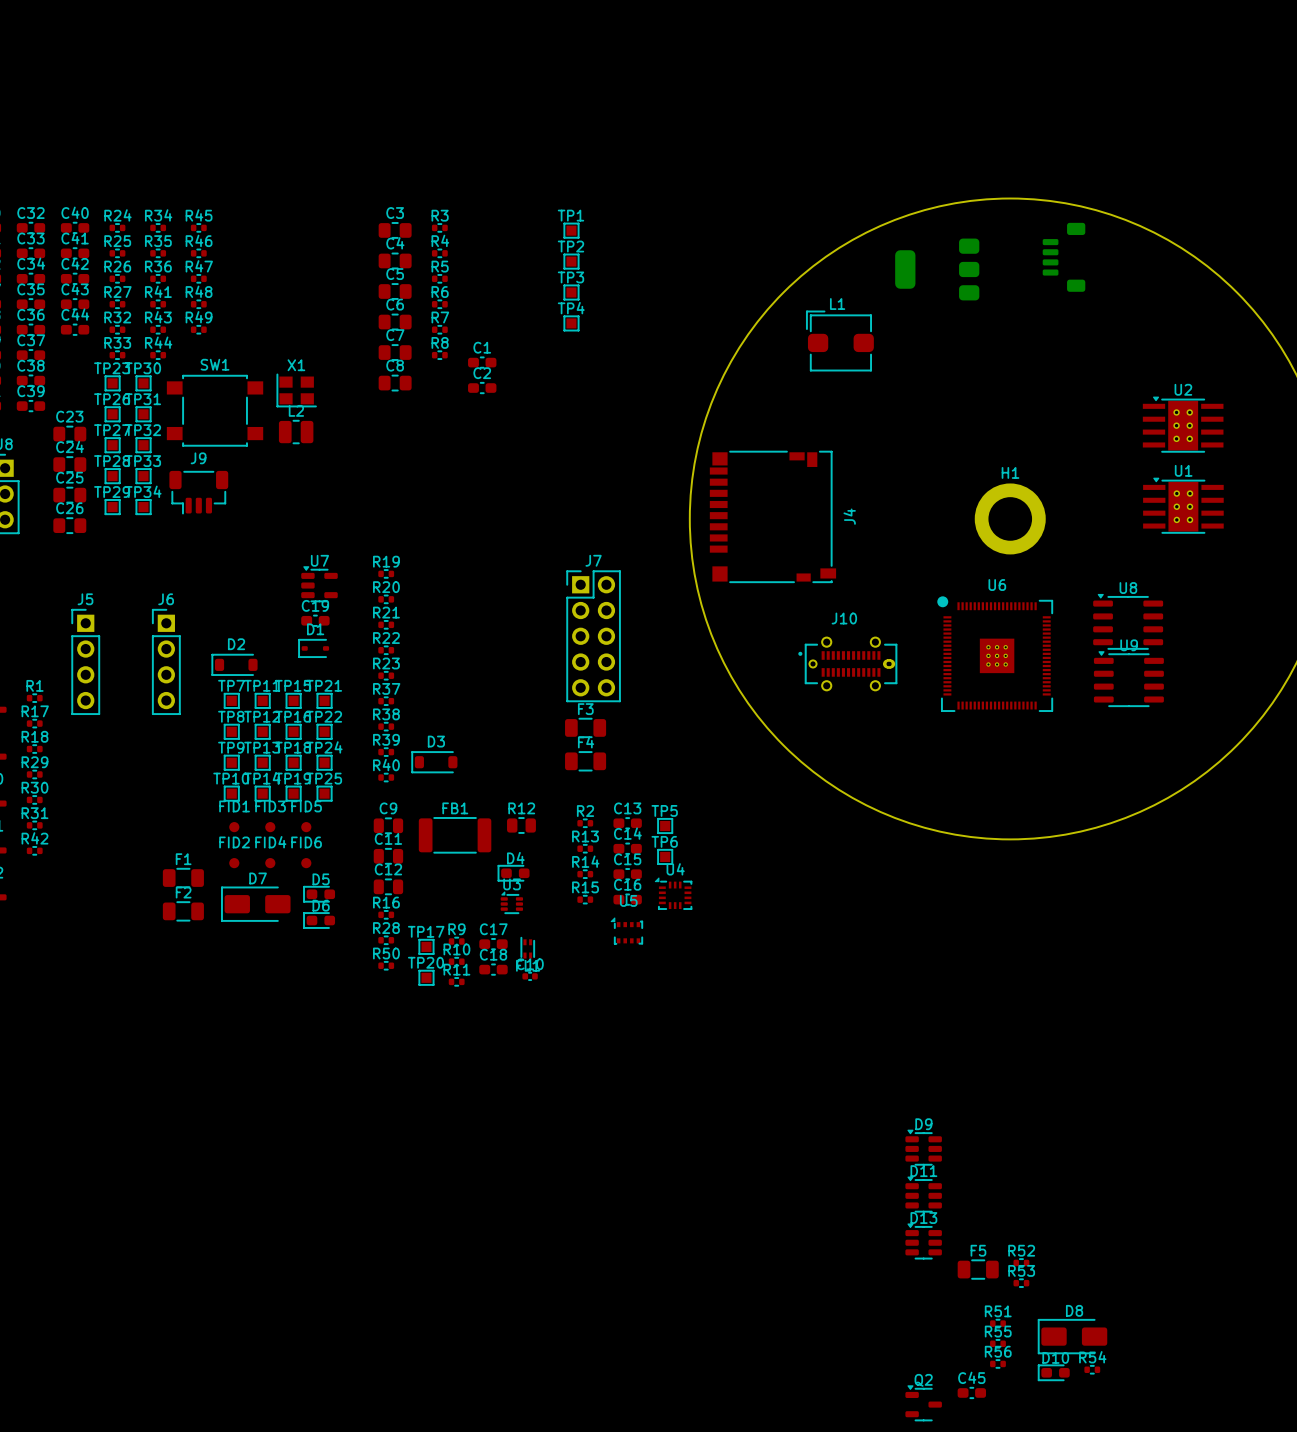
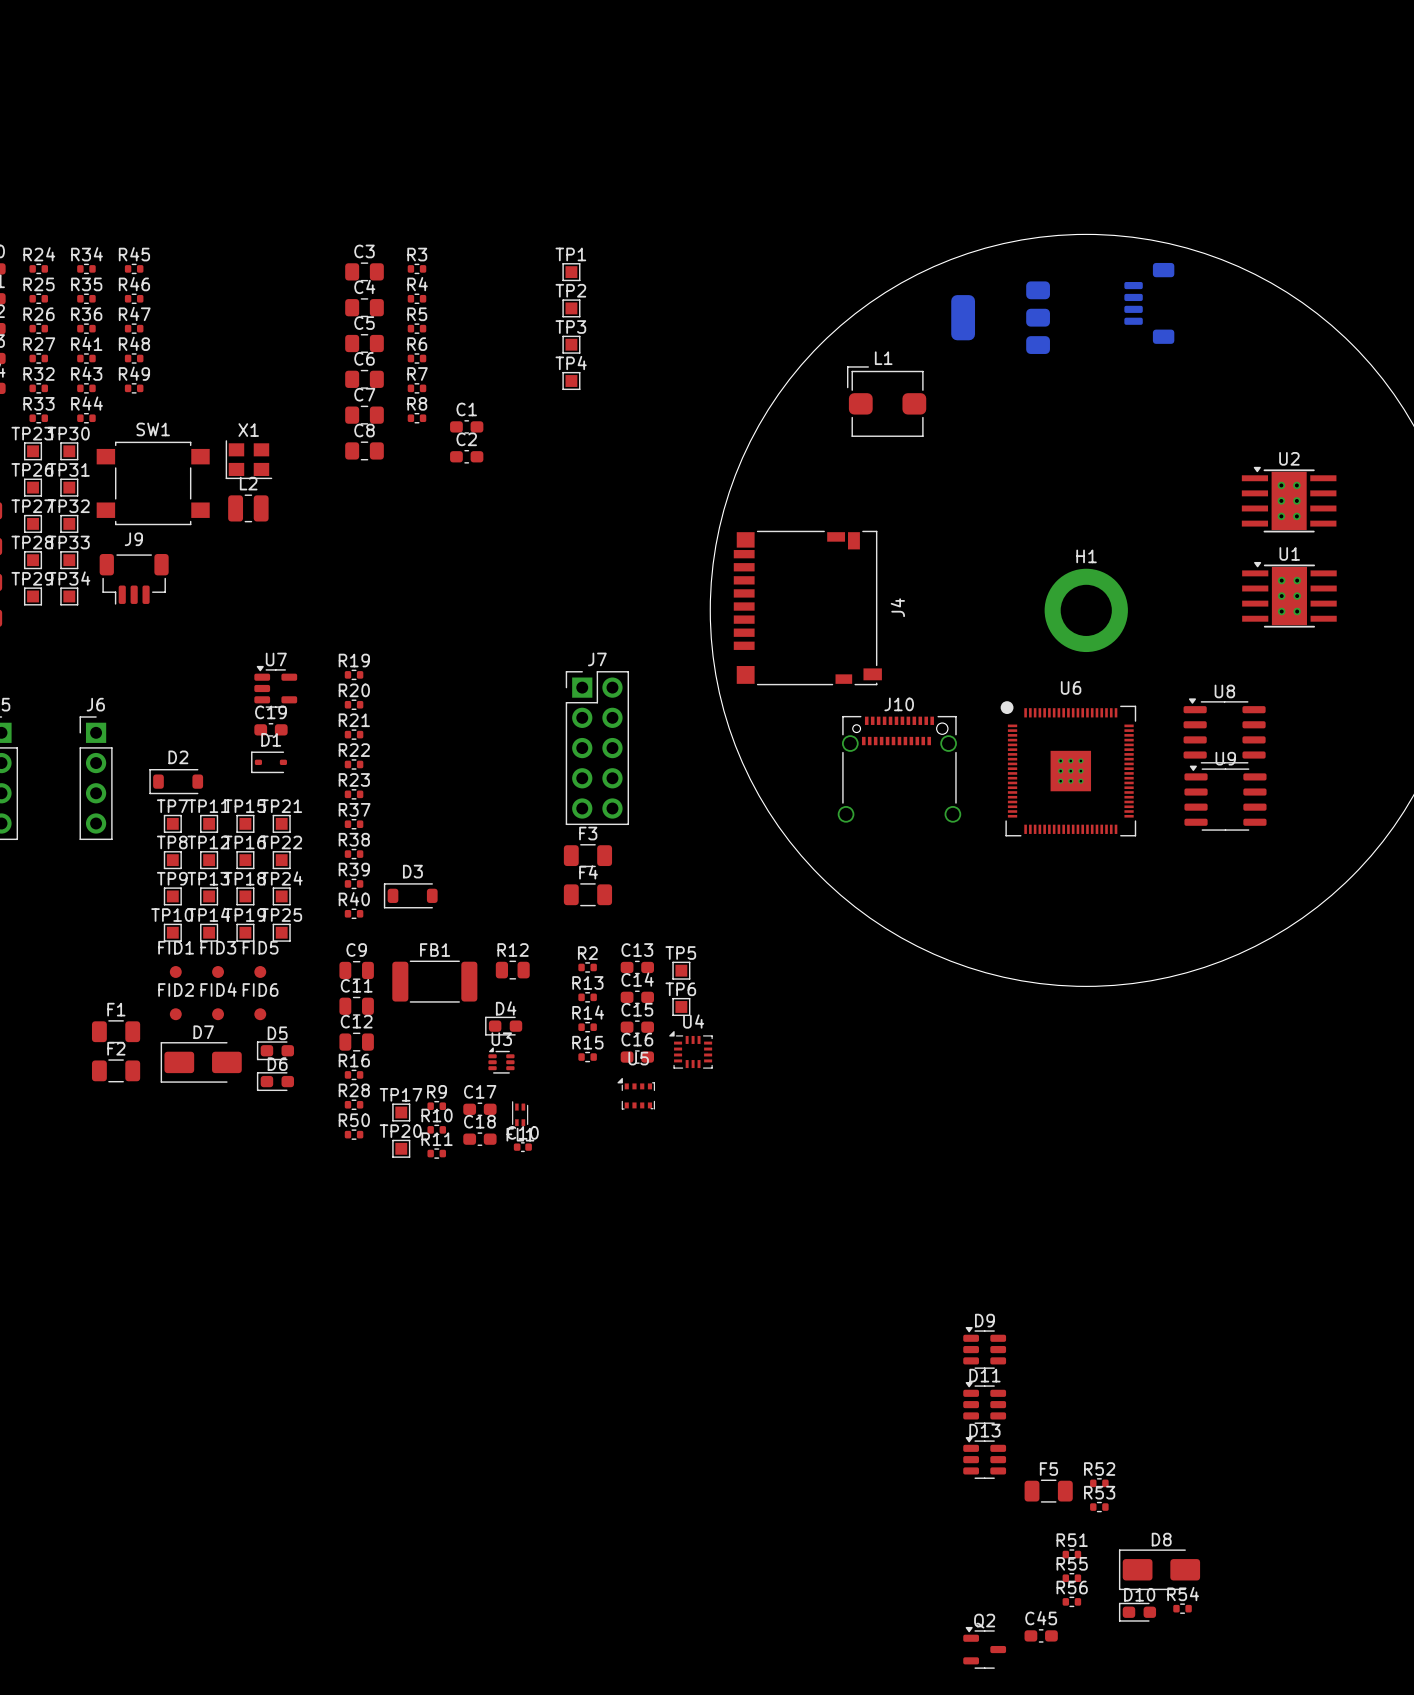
J10 footprint: [798, 636, 898, 692] -> [837, 715, 962, 823]

